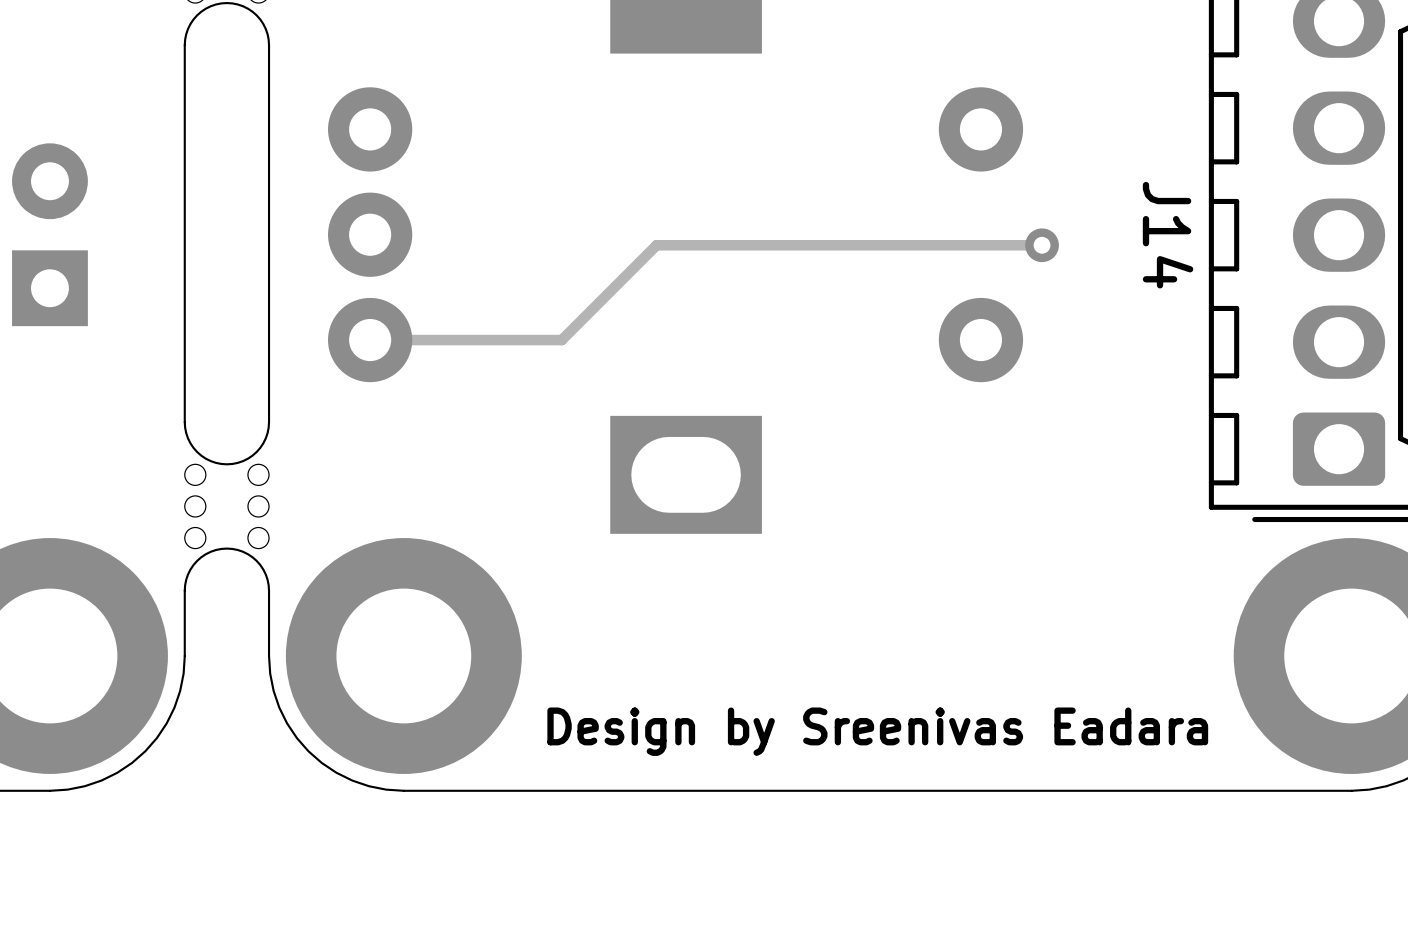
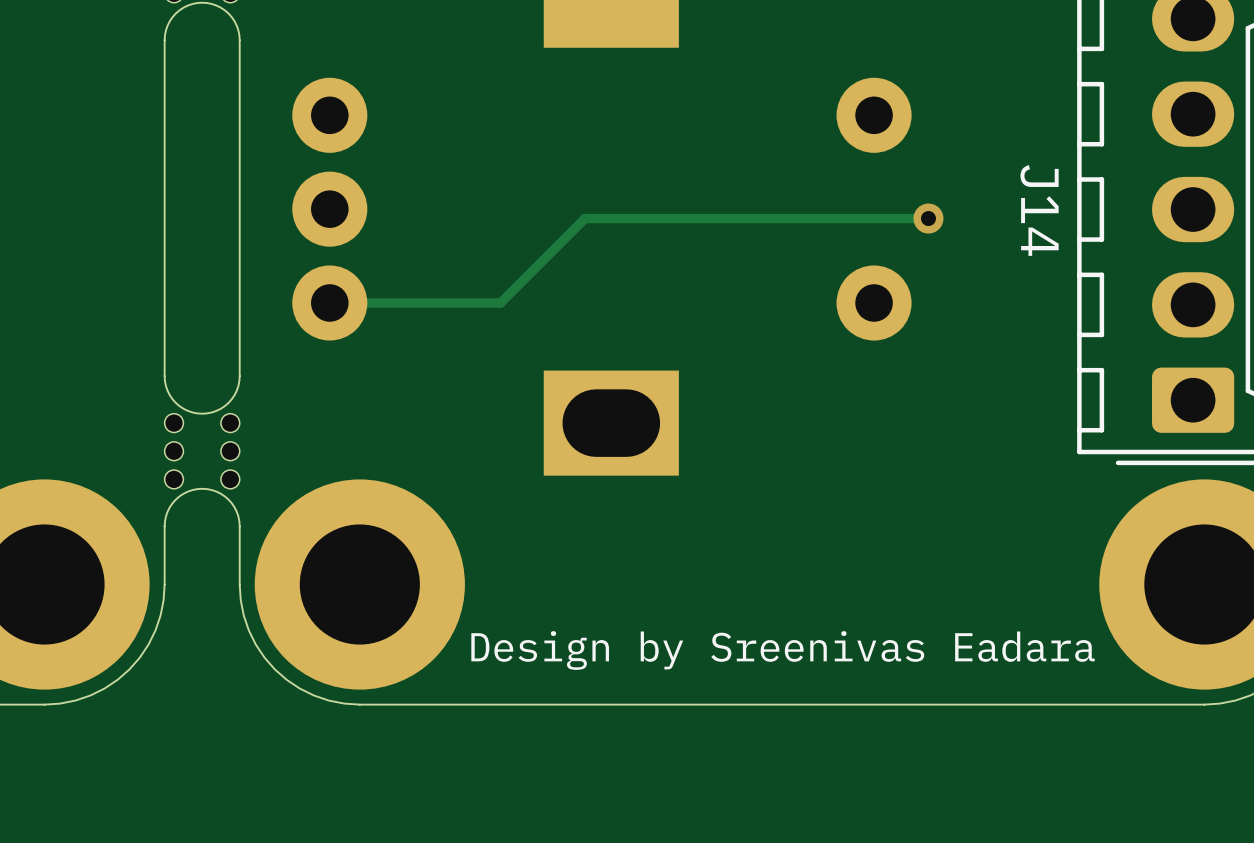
part: (49, 234) -> none

